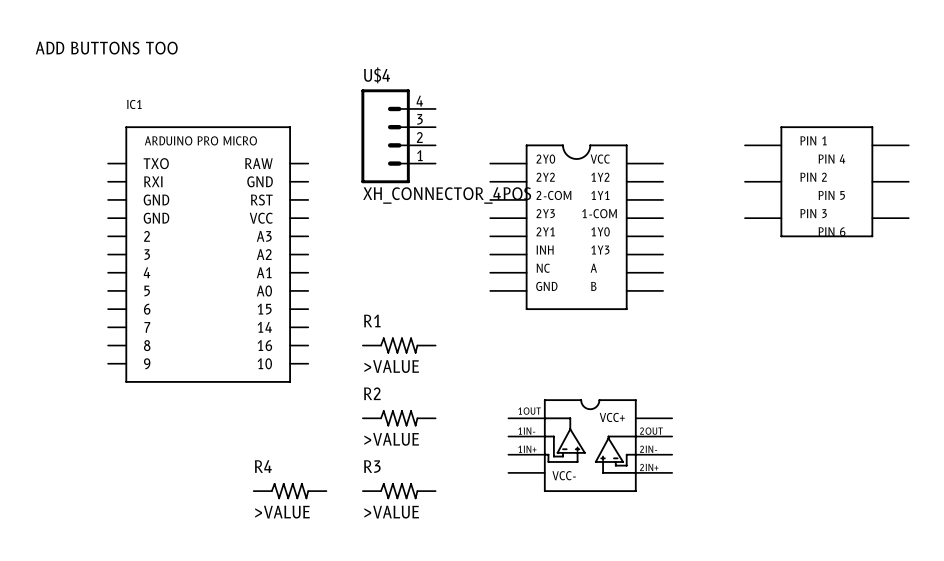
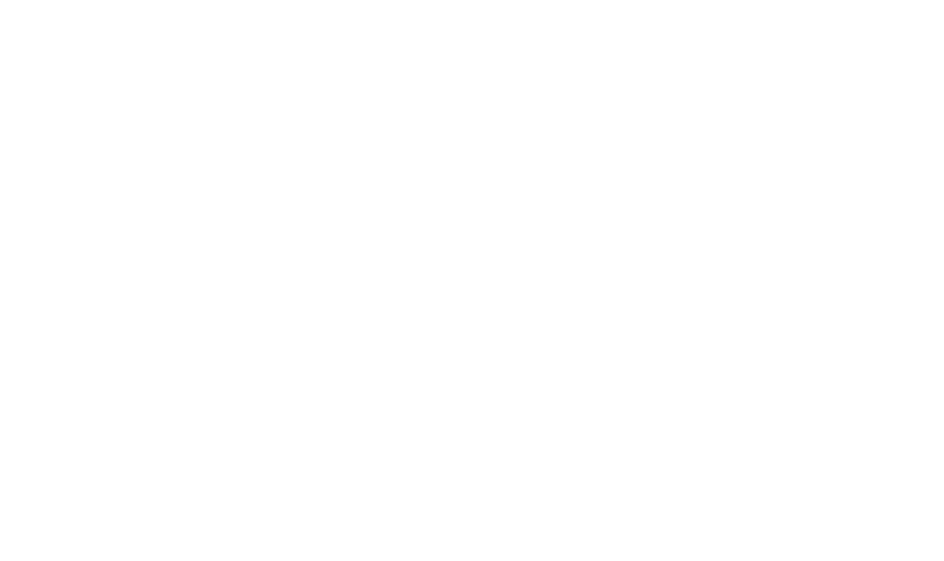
text: ADD BUTTONS TOO (106, 48) -> none
U$4: XH_CONNECTOR_4POS (398, 136) -> none
part: (826, 181) -> none
part: (576, 227) -> none
IC1: (208, 254) -> none
R1: >VALUE (399, 345) -> none
R2: >VALUE (399, 418) -> none
part: (590, 445) -> none
R4: >VALUE (290, 491) -> none
R3: >VALUE (399, 491) -> none

